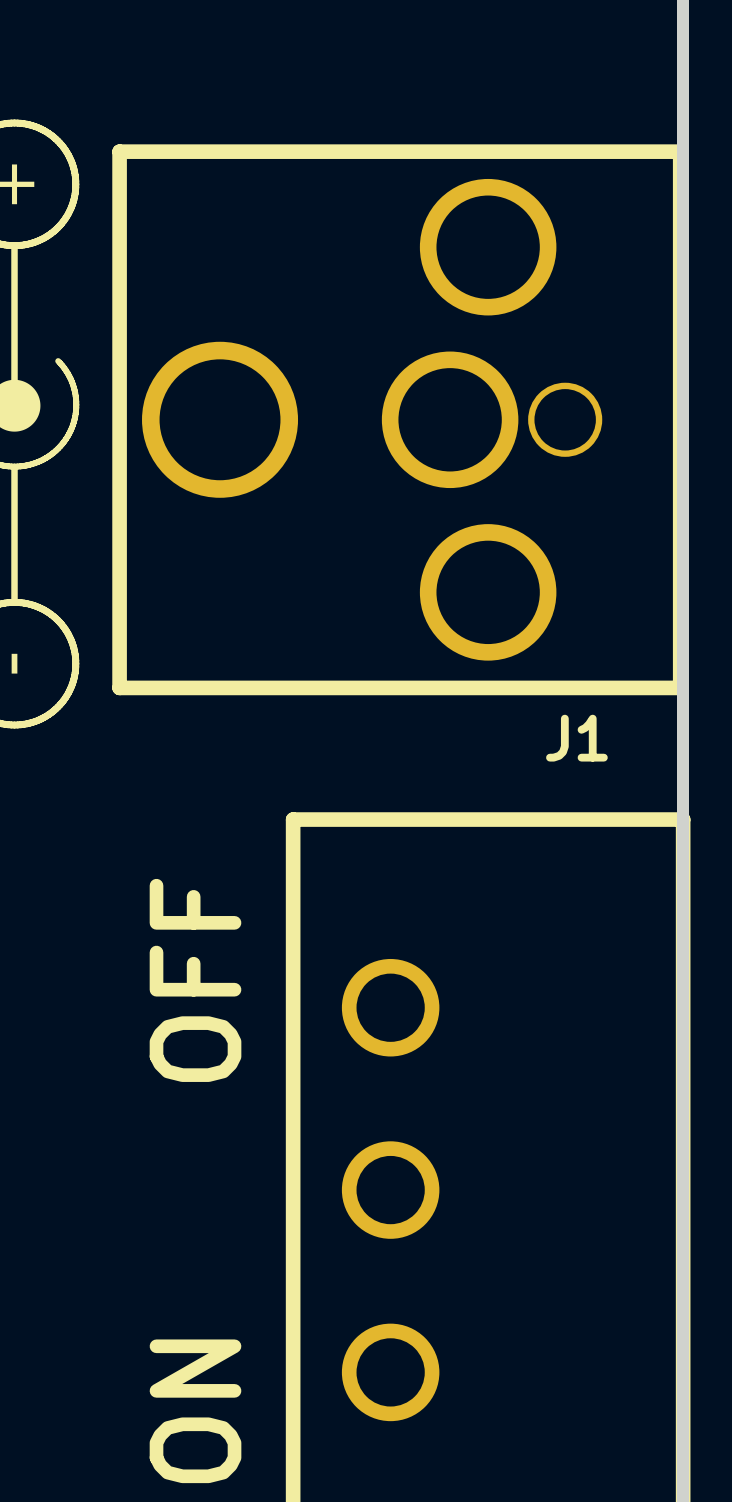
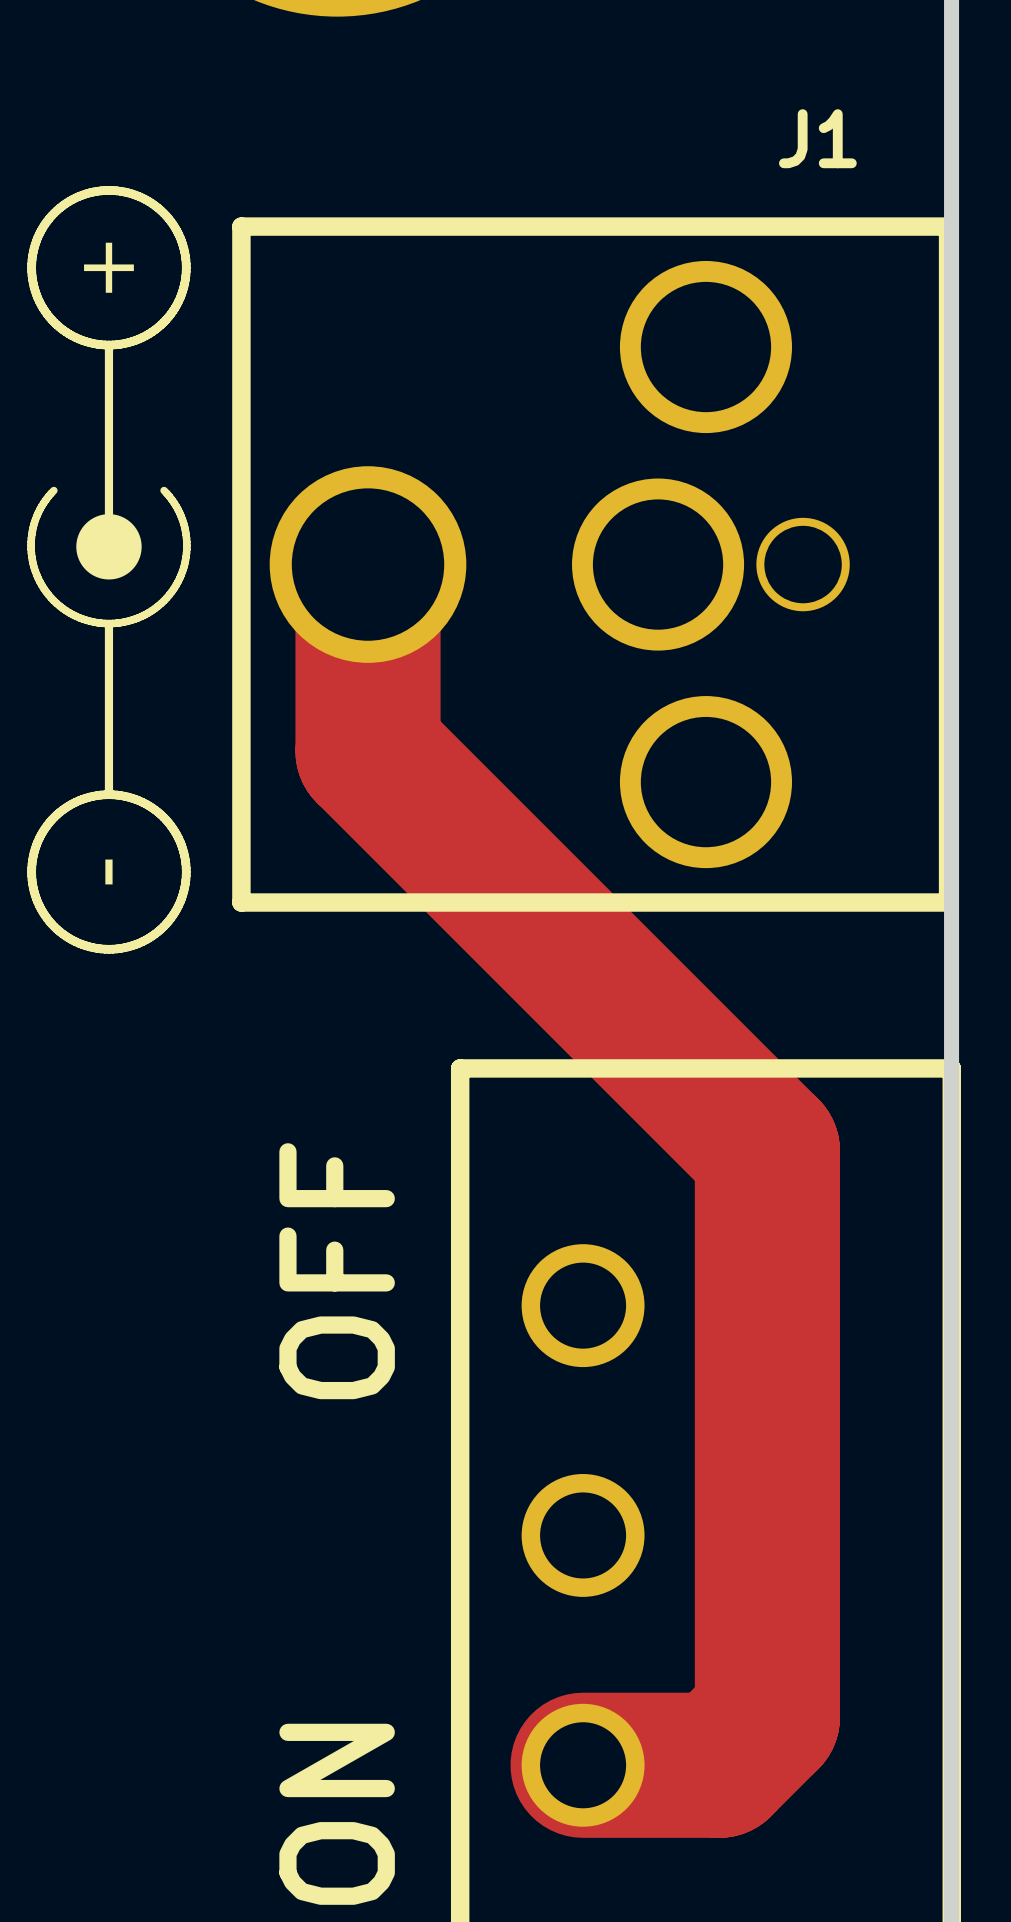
top track: none -> (368, 564) (368, 751) (767, 1150) (767, 1717) (719, 1765) (583, 1765)
J1 name position: J1 (576, 738) -> J1 (817, 138)

